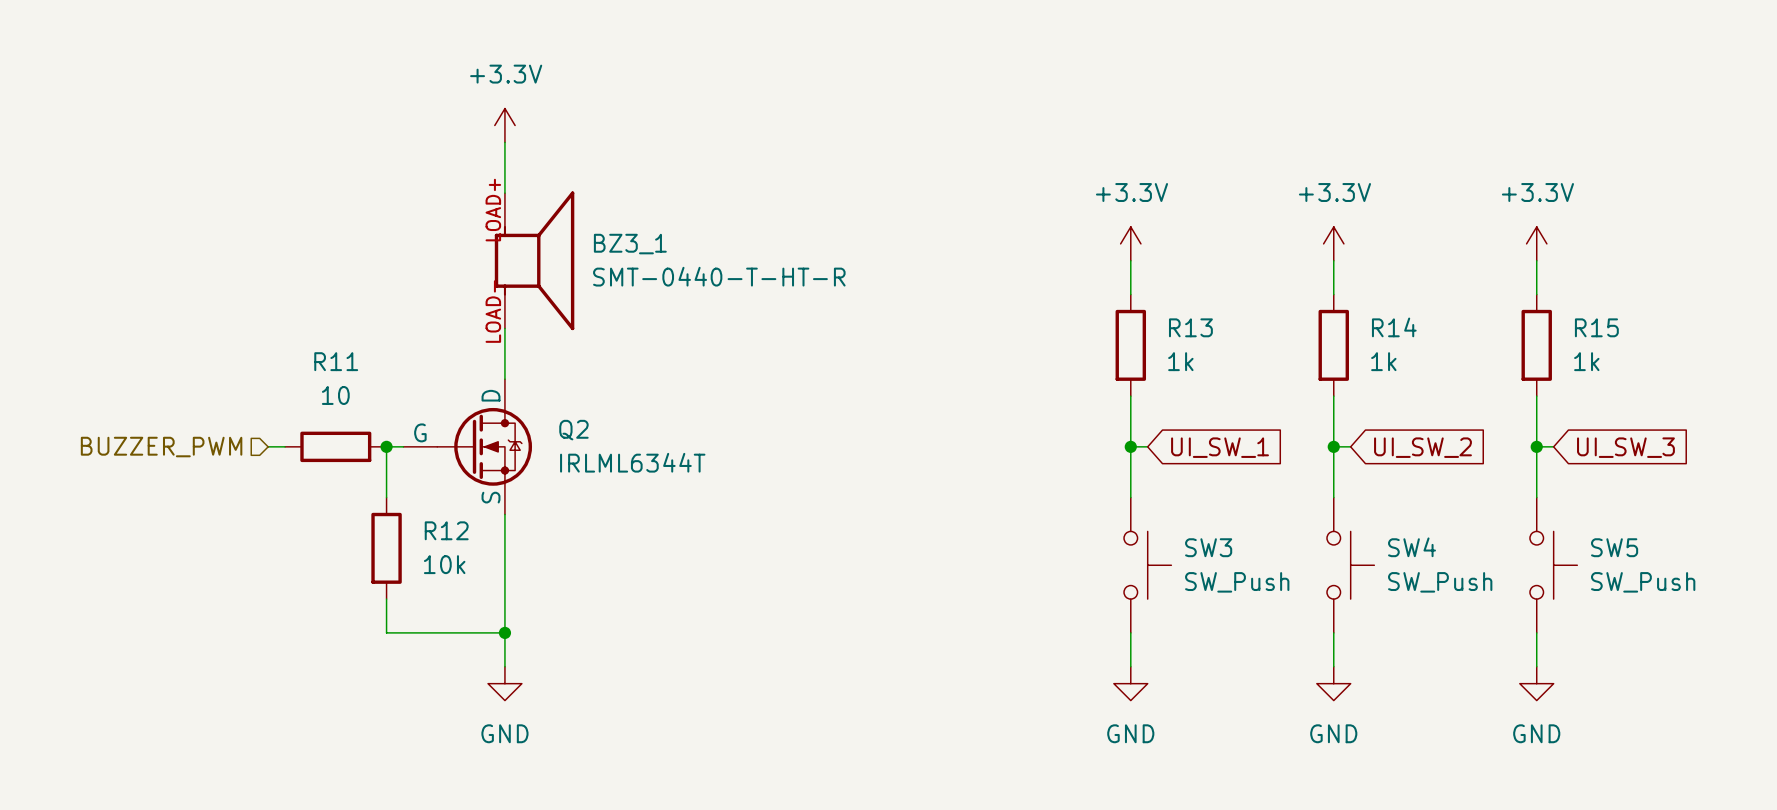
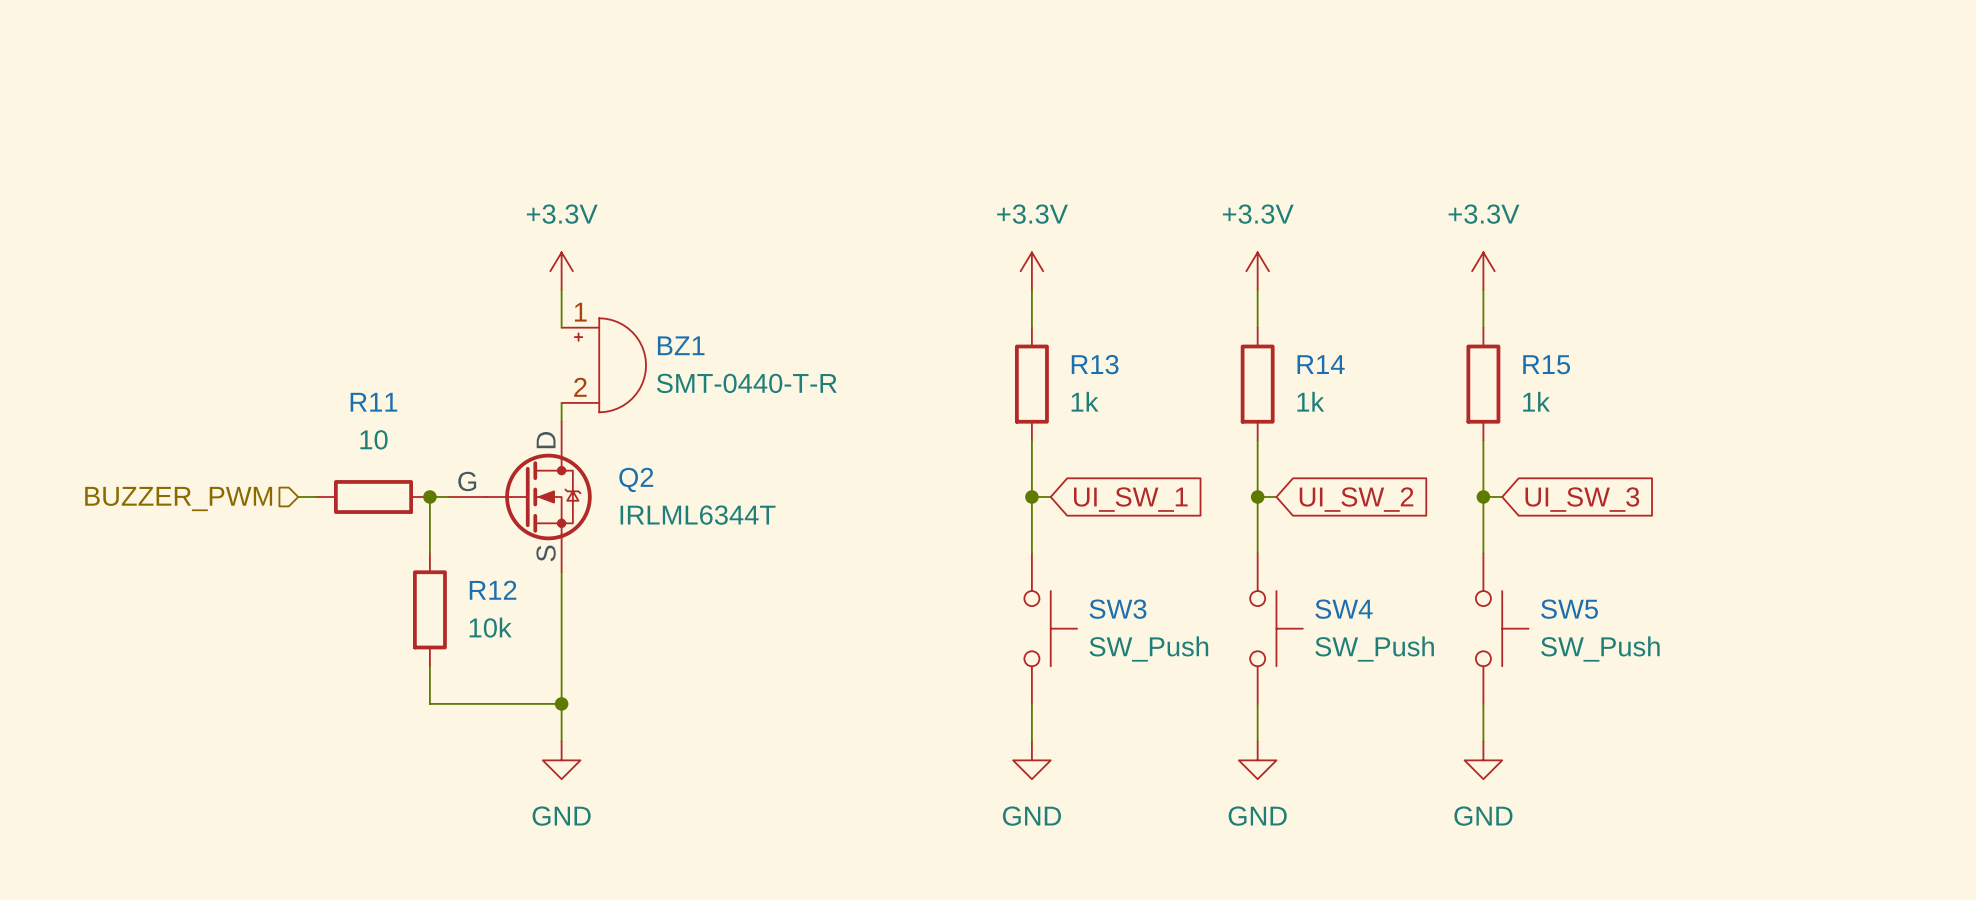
power symbol position: +3.3V (504, 125) -> +3.3V (561, 271)
wire: (504, 142) (504, 193) -> none
power symbol: none -> +3.3V (1031, 271)
power symbol: +3.3V (1536, 243) -> none
BZ3_1: SMT-0440-T-HT-R (534, 260) -> none
wire: none -> (1031, 290) (1031, 327)
wire: (1536, 260) (1536, 294) -> none
R13 name: R13 (1190, 327) -> R14 (1321, 364)
R14 name: R14 (1394, 327) -> R15 (1546, 364)
wire: (504, 328) (504, 362) -> (561, 290) (561, 327)
BZ1: none -> SMT-0440-T-R (603, 365)
R13: none -> 1k (1031, 384)
R15: 1k (1536, 345) -> none
wire: none -> (1031, 440) (1031, 553)
wire: (1536, 396) (1536, 497) -> none
wire: none -> (1031, 496) (1050, 496)
junction: none -> (1031, 496)
wire: (1536, 446) (1553, 446) -> none
junction: (1536, 446) -> none
global label: none -> UI_SW_1 (1130, 499)
global label: UI_SW_1 (1220, 447) -> UI_SW_2 (1356, 499)
global label: UI_SW_2 (1422, 447) -> UI_SW_3 (1582, 499)
global label: UI_SW_3 (1625, 447) -> none
SW3 name: SW3 (1208, 547) -> SW4 (1343, 609)
SW4 name: SW4 (1412, 547) -> SW5 (1569, 609)
SW3: none -> SW_Push (1050, 628)
SW5: SW_Push (1553, 565) -> none
wire: none -> (1031, 703) (1031, 741)
wire: (1536, 632) (1536, 666) -> none
power symbol: none -> GND (1031, 760)
power symbol: GND (1536, 683) -> none

